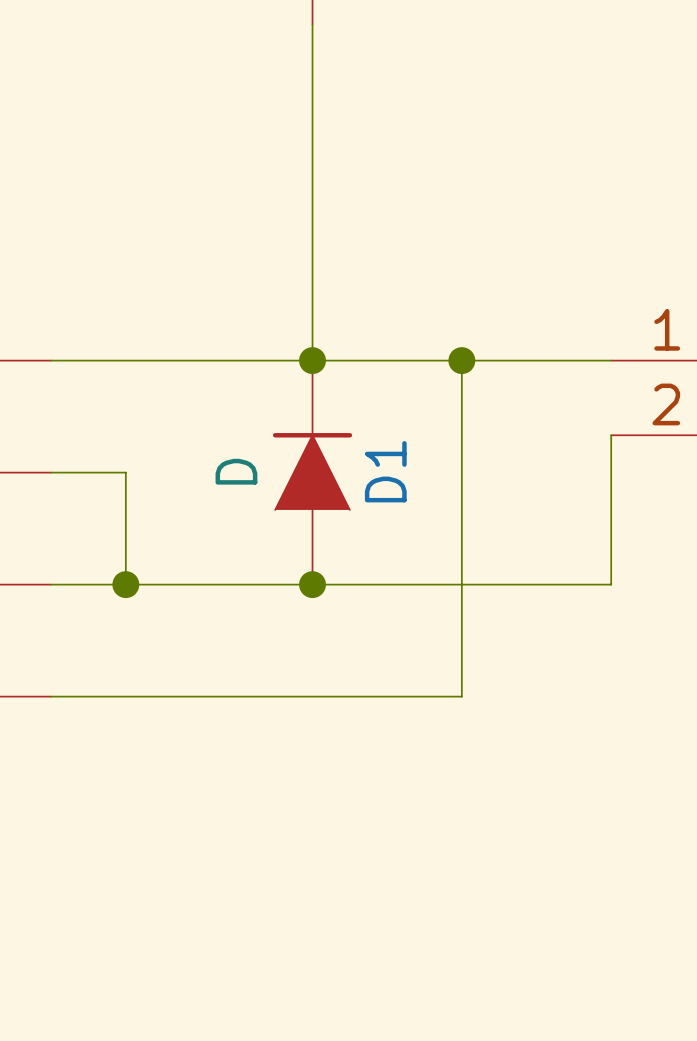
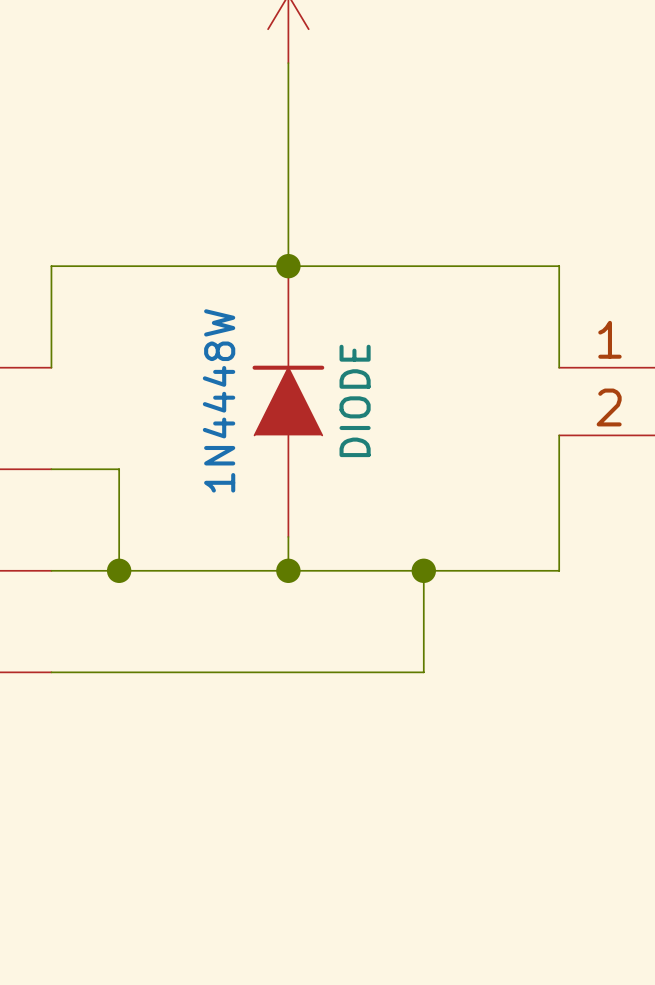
junction: none -> (288, 266)
wire: (51, 360) (611, 360) -> (51, 367) (51, 266) (559, 266) (559, 367)
junction: (312, 360) -> none
wire: (461, 360) (461, 584) -> none
junction: (461, 360) -> none
1N4448W: none -> DIODE (288, 401)
D1: D (312, 472) -> none
junction: none -> (423, 570)

